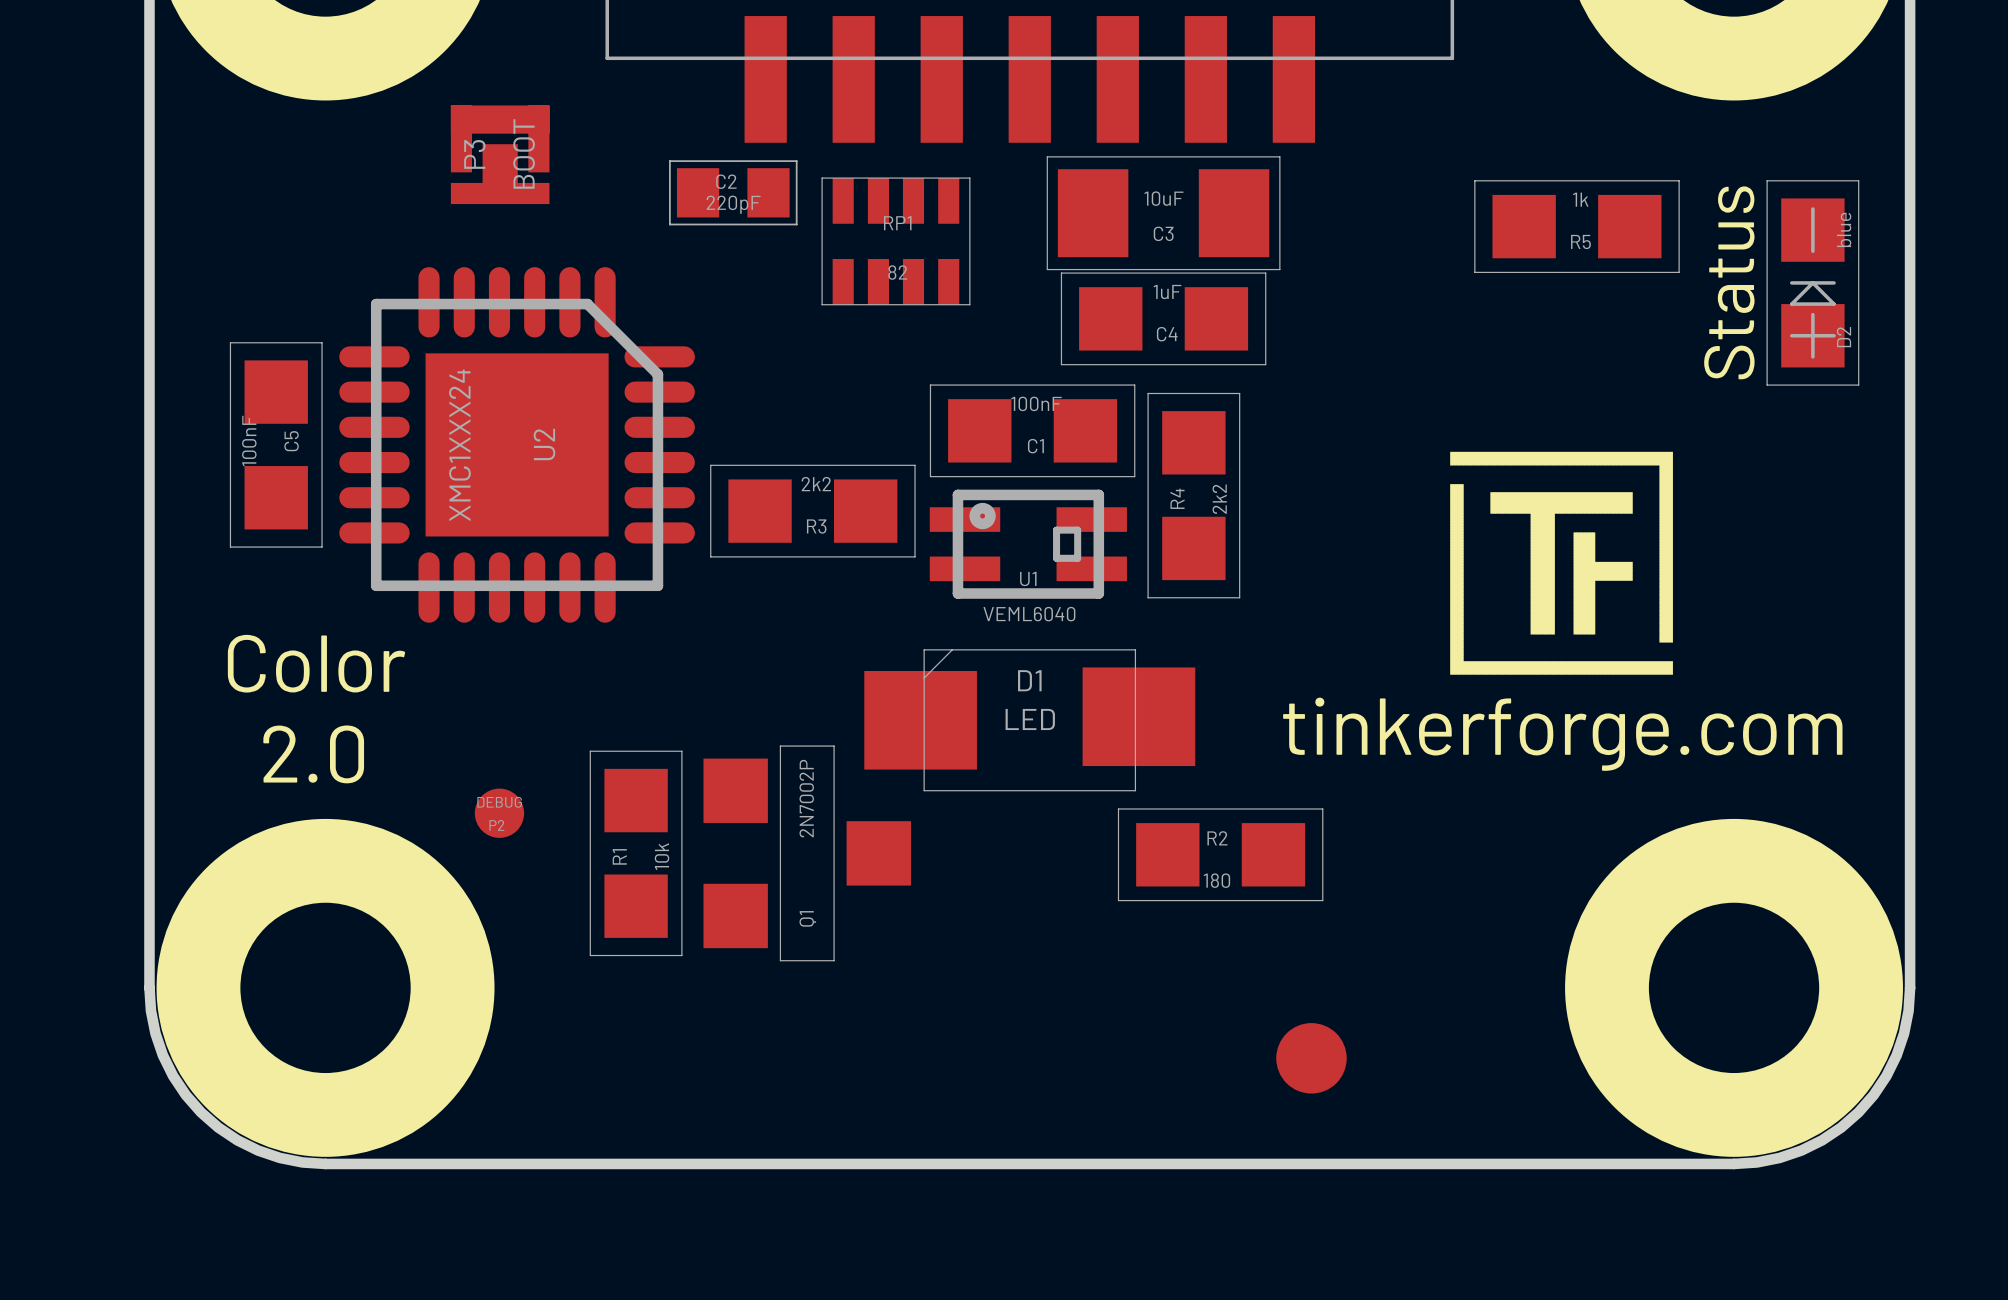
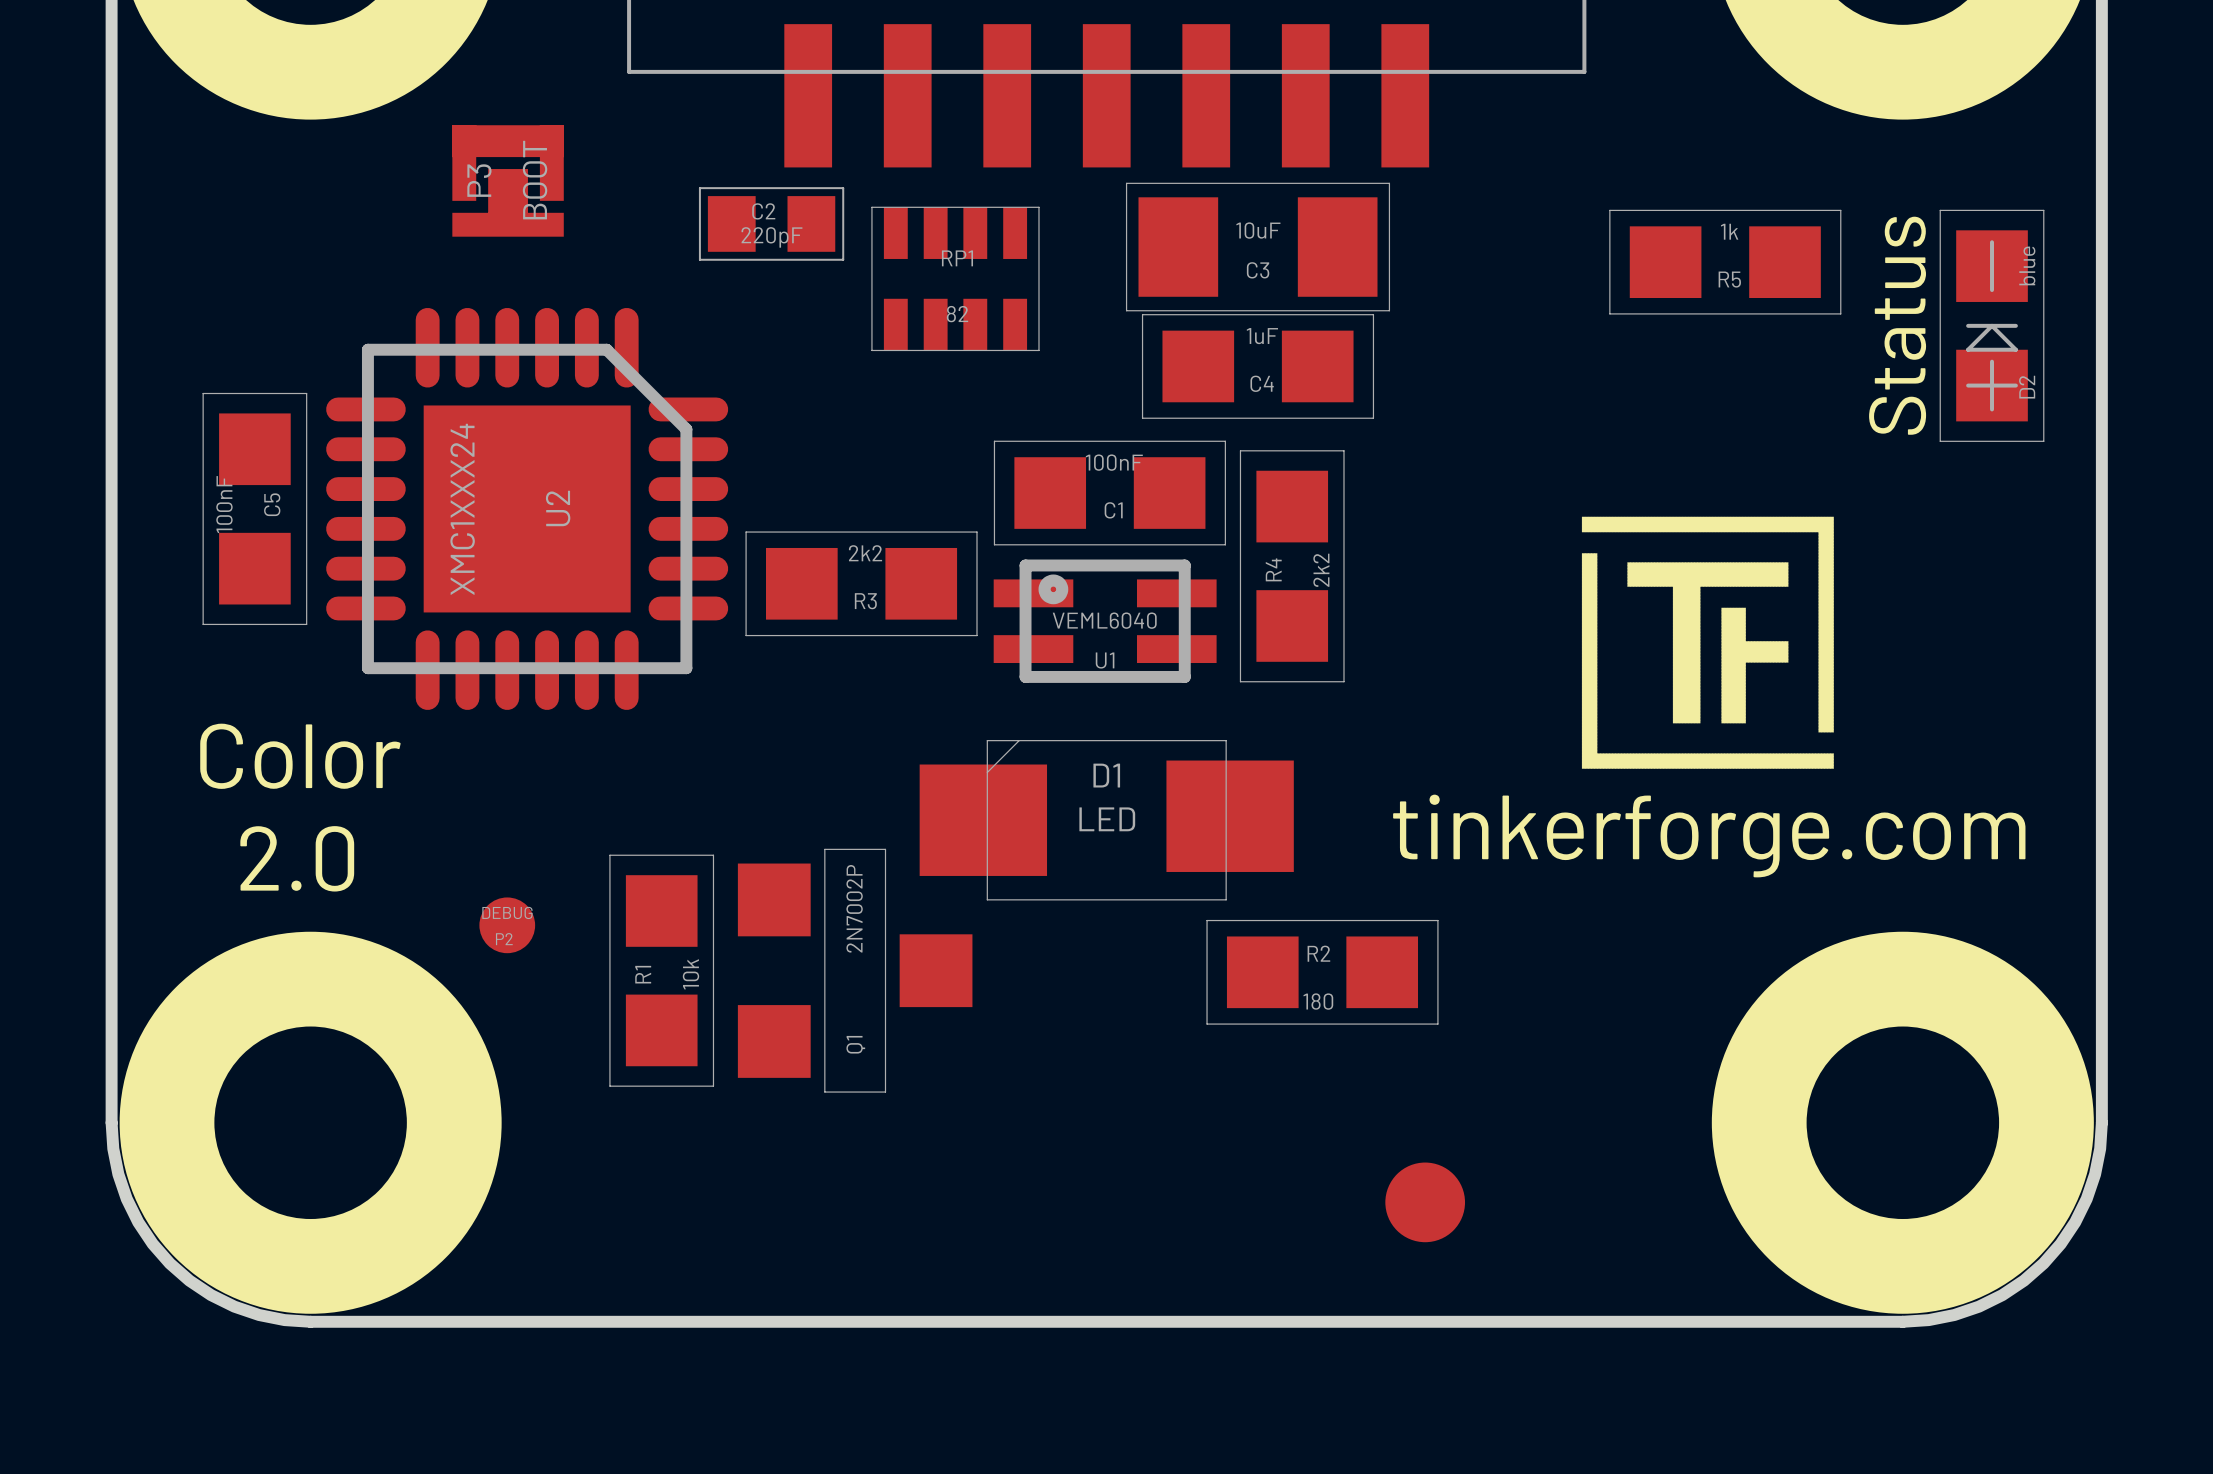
U1 footprint: [929, 489, 1127, 599] -> [993, 559, 1217, 683]
U1 value position: VEML6040 (1029, 614) -> VEML6040 (1104, 620)

